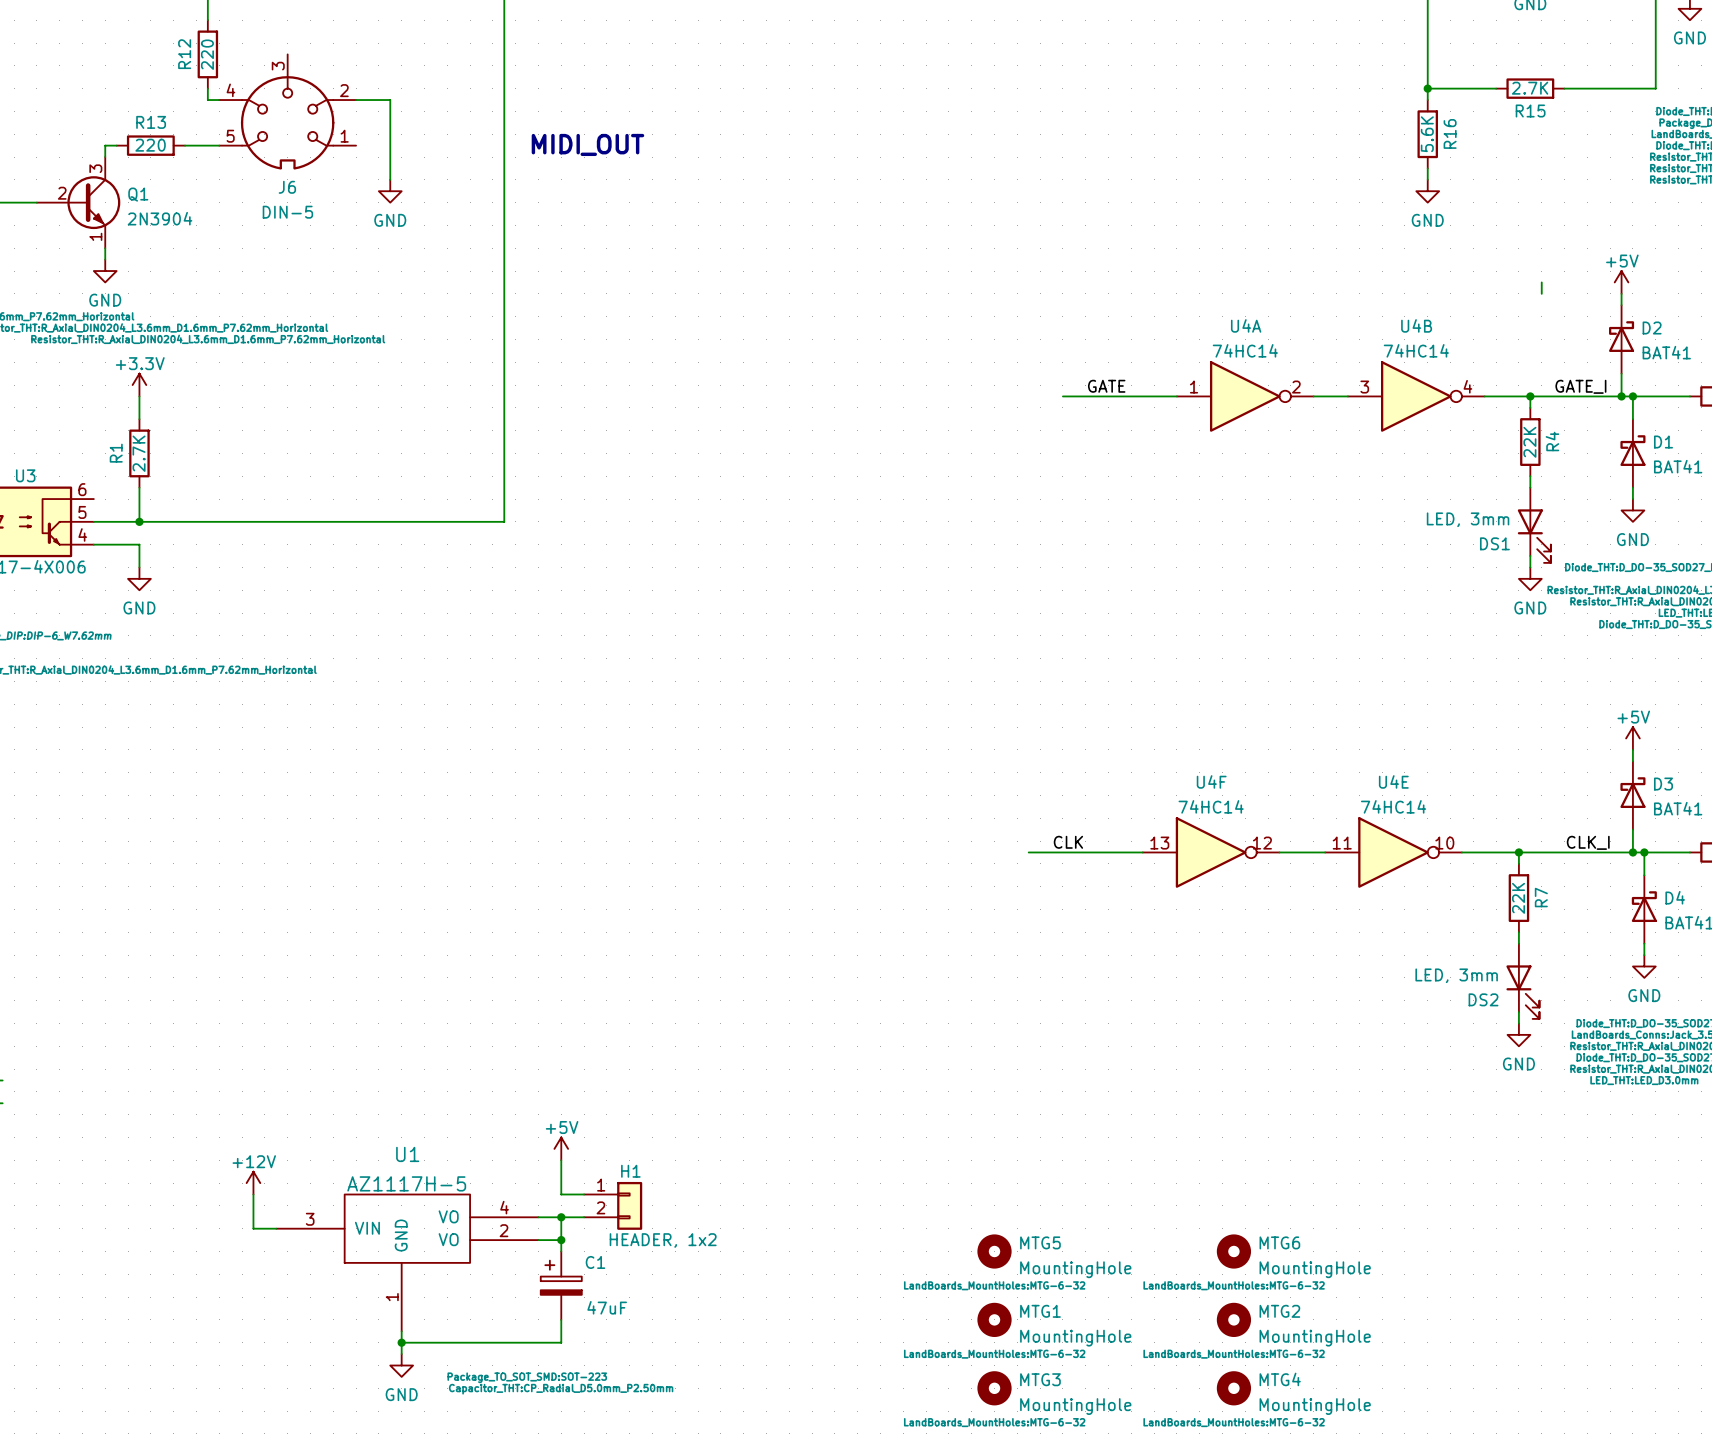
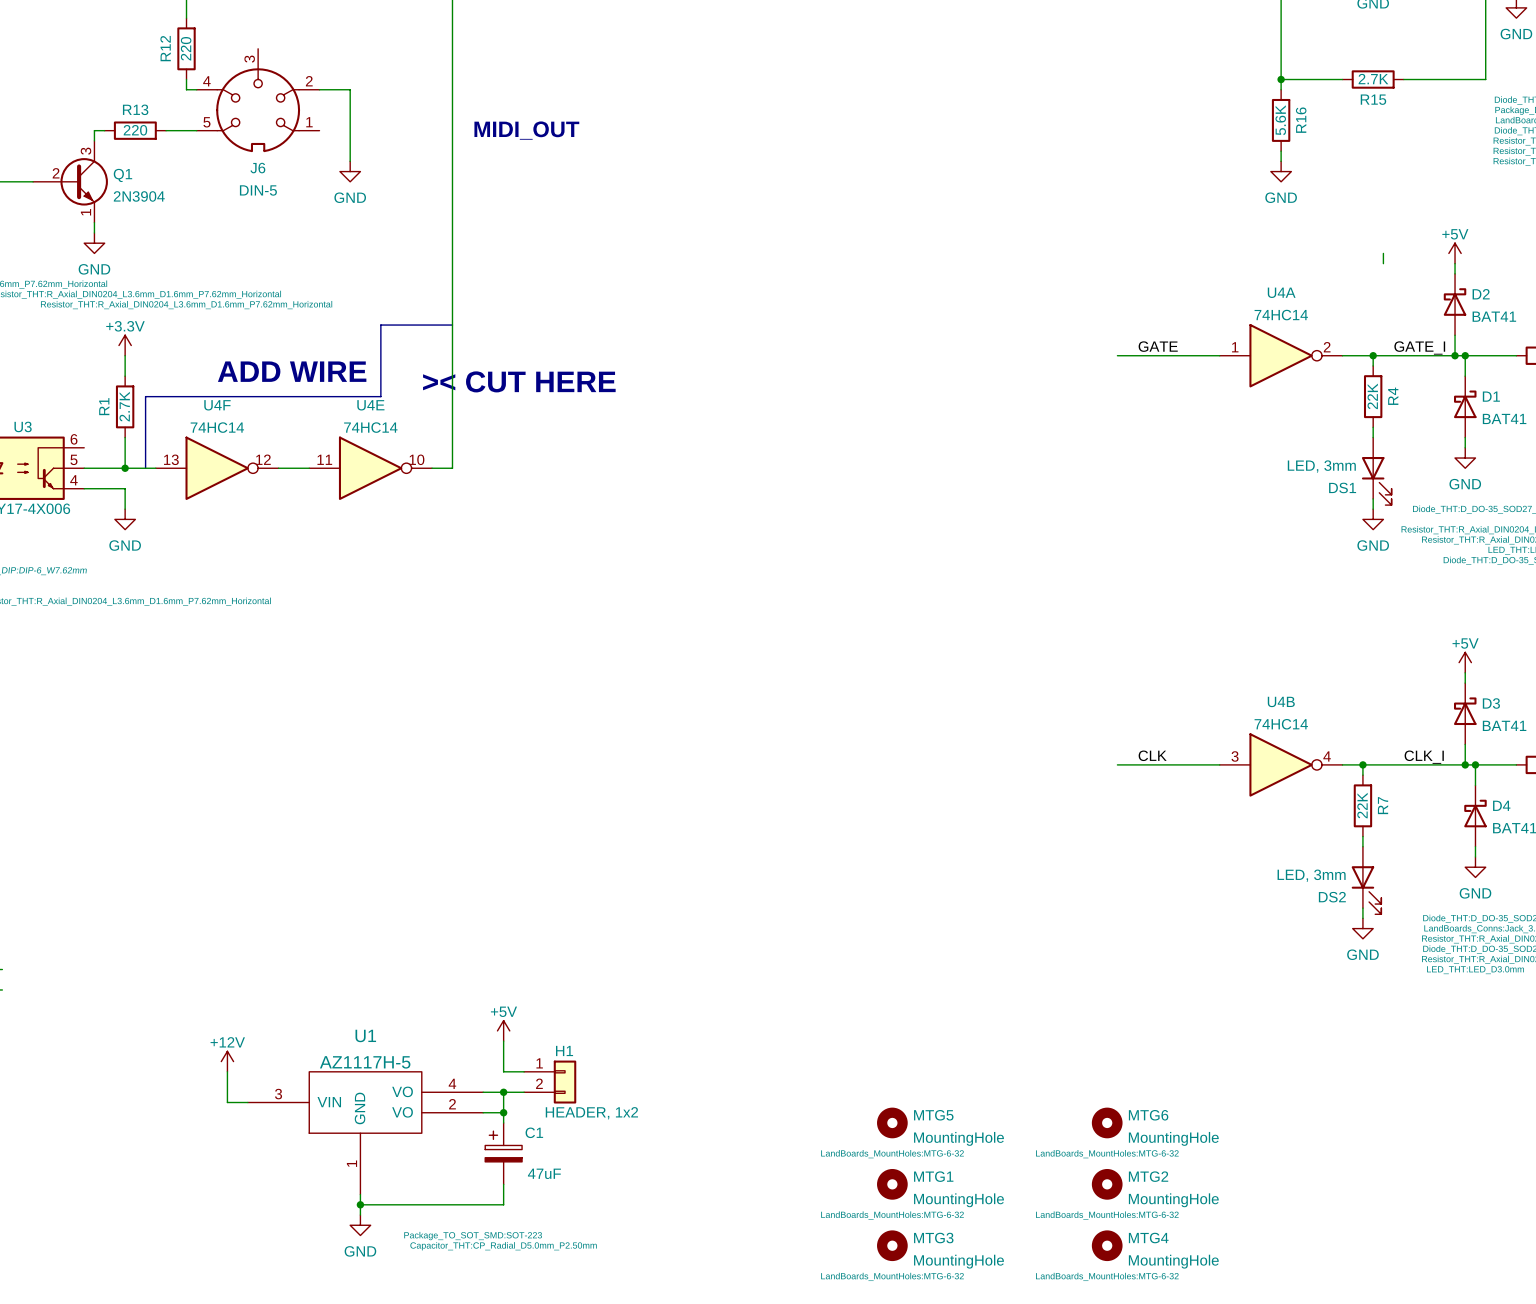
line: none -> (452, 325) (380, 325) (380, 396) (145, 396) (145, 468)
label position: GATE (1106, 386) -> GATE (1158, 346)
wire: (1062, 396) (1176, 396) -> none
U4A position: (1245, 396) -> (1281, 355)
U4B position: (1416, 396) -> (1281, 764)
text: none -> ADD WIRE (292, 371)
text: none -> >< CUT HERE (519, 381)
label position: CLK (1068, 842) -> CLK (1152, 755)
wire: (1028, 852) (1142, 852) -> none
U4F position: (1211, 852) -> (217, 468)
U4E position: (1393, 852) -> (370, 468)

